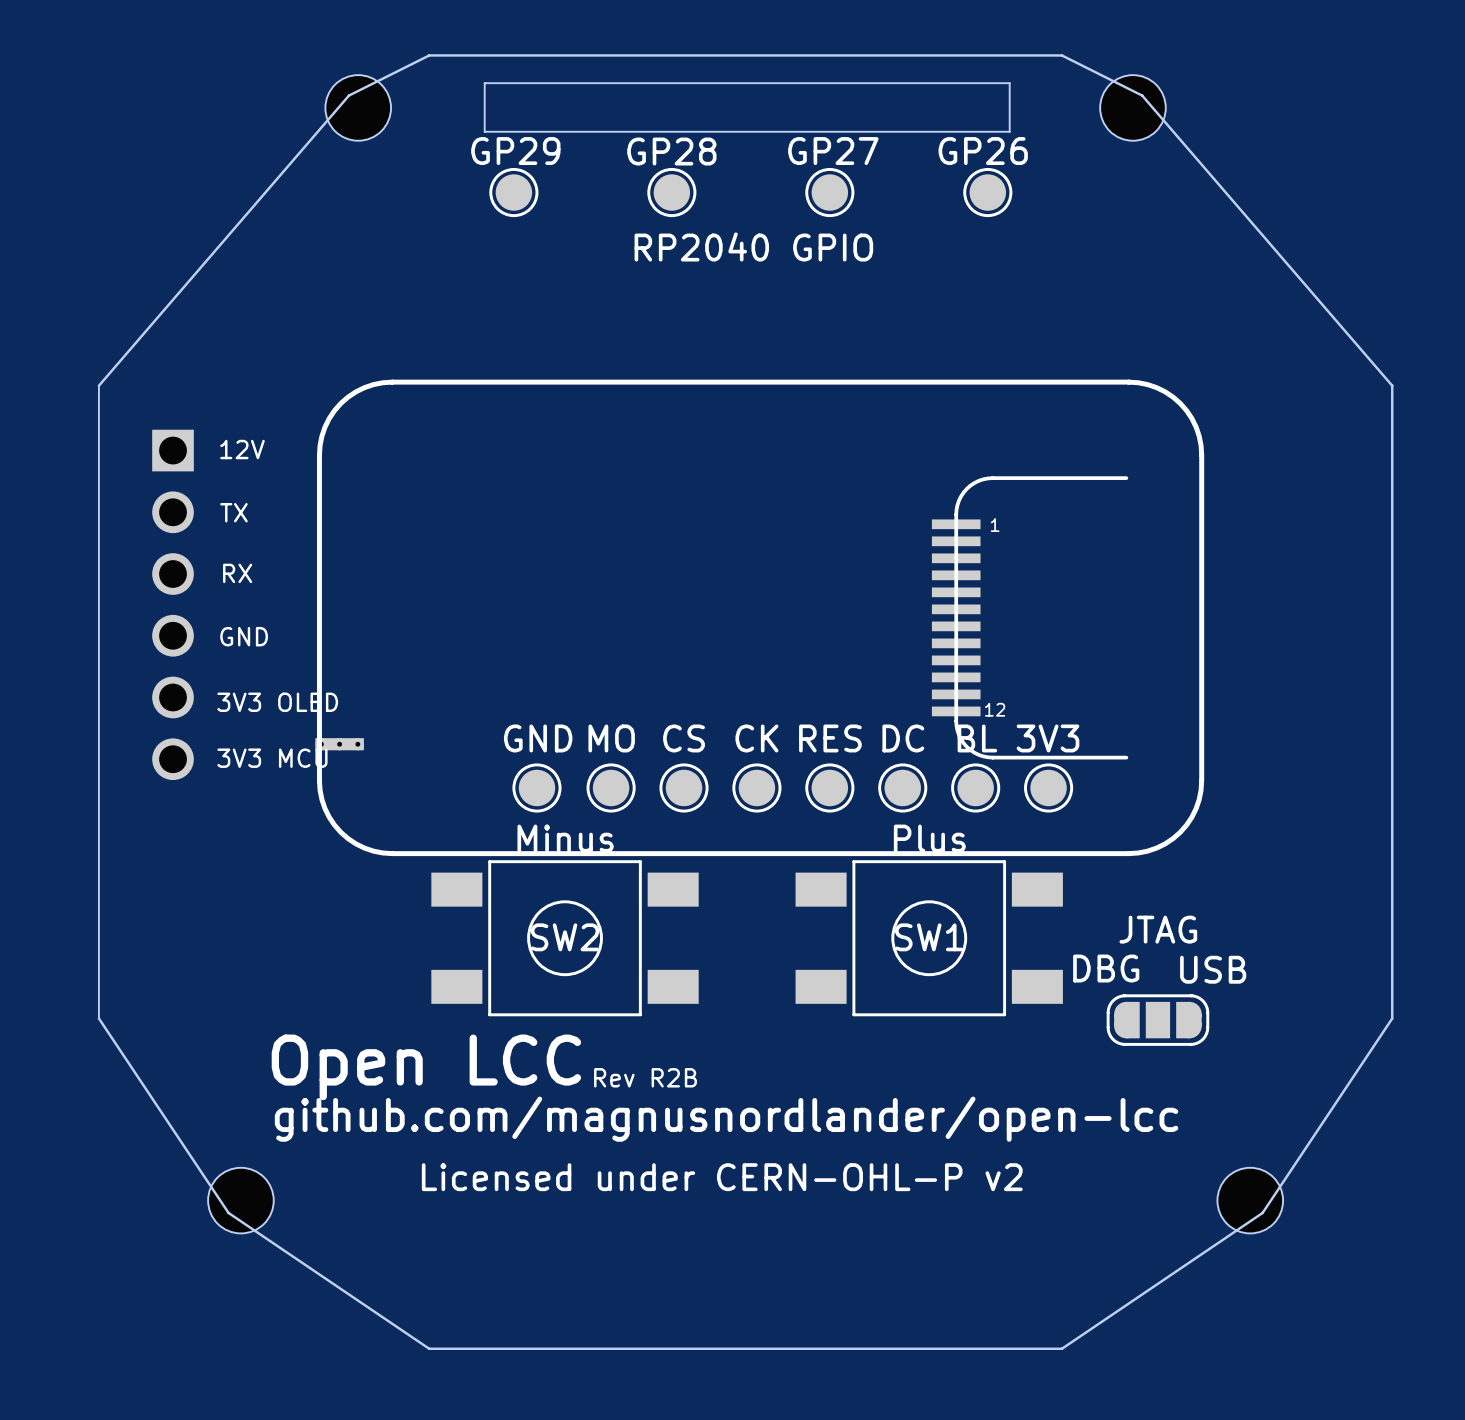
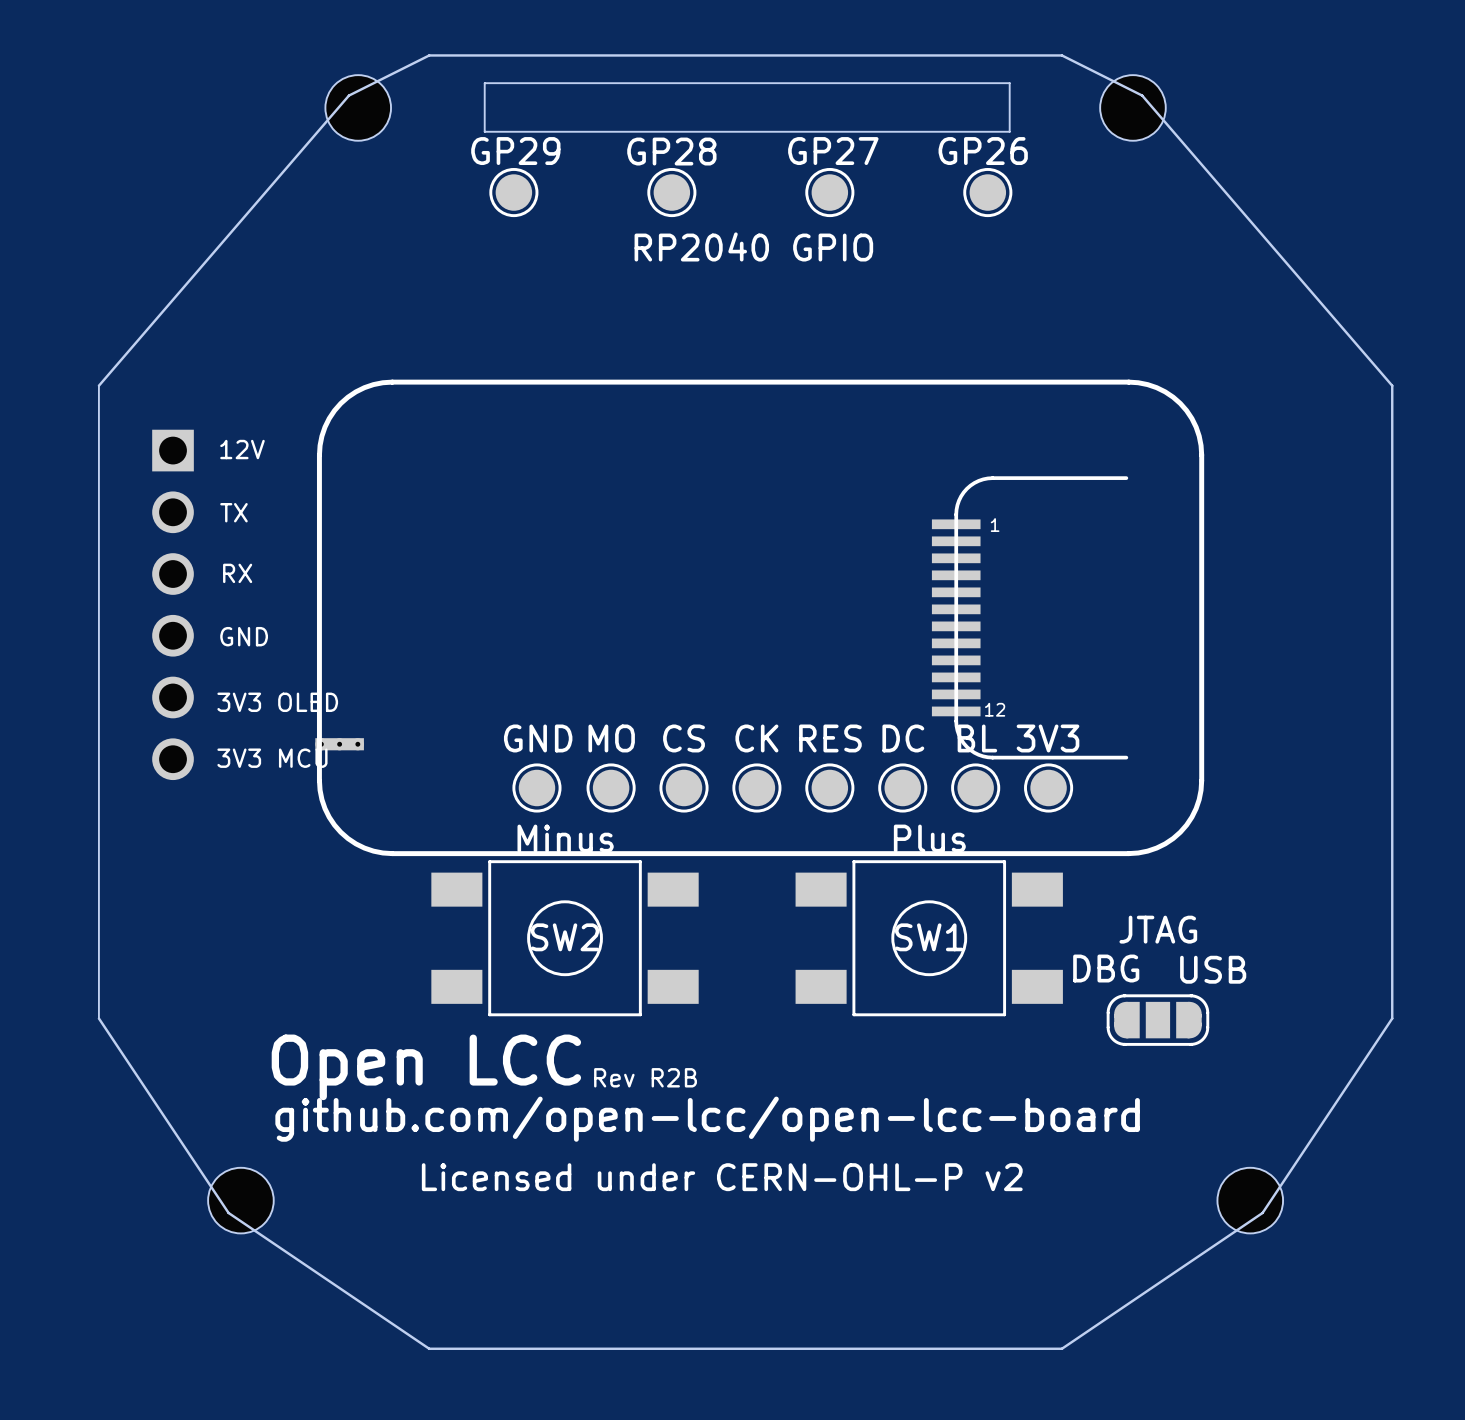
text: github.com/magnusnordlander/open-lcc (726, 1119) -> github.com/open-lcc/open-lcc-board (707, 1119)

